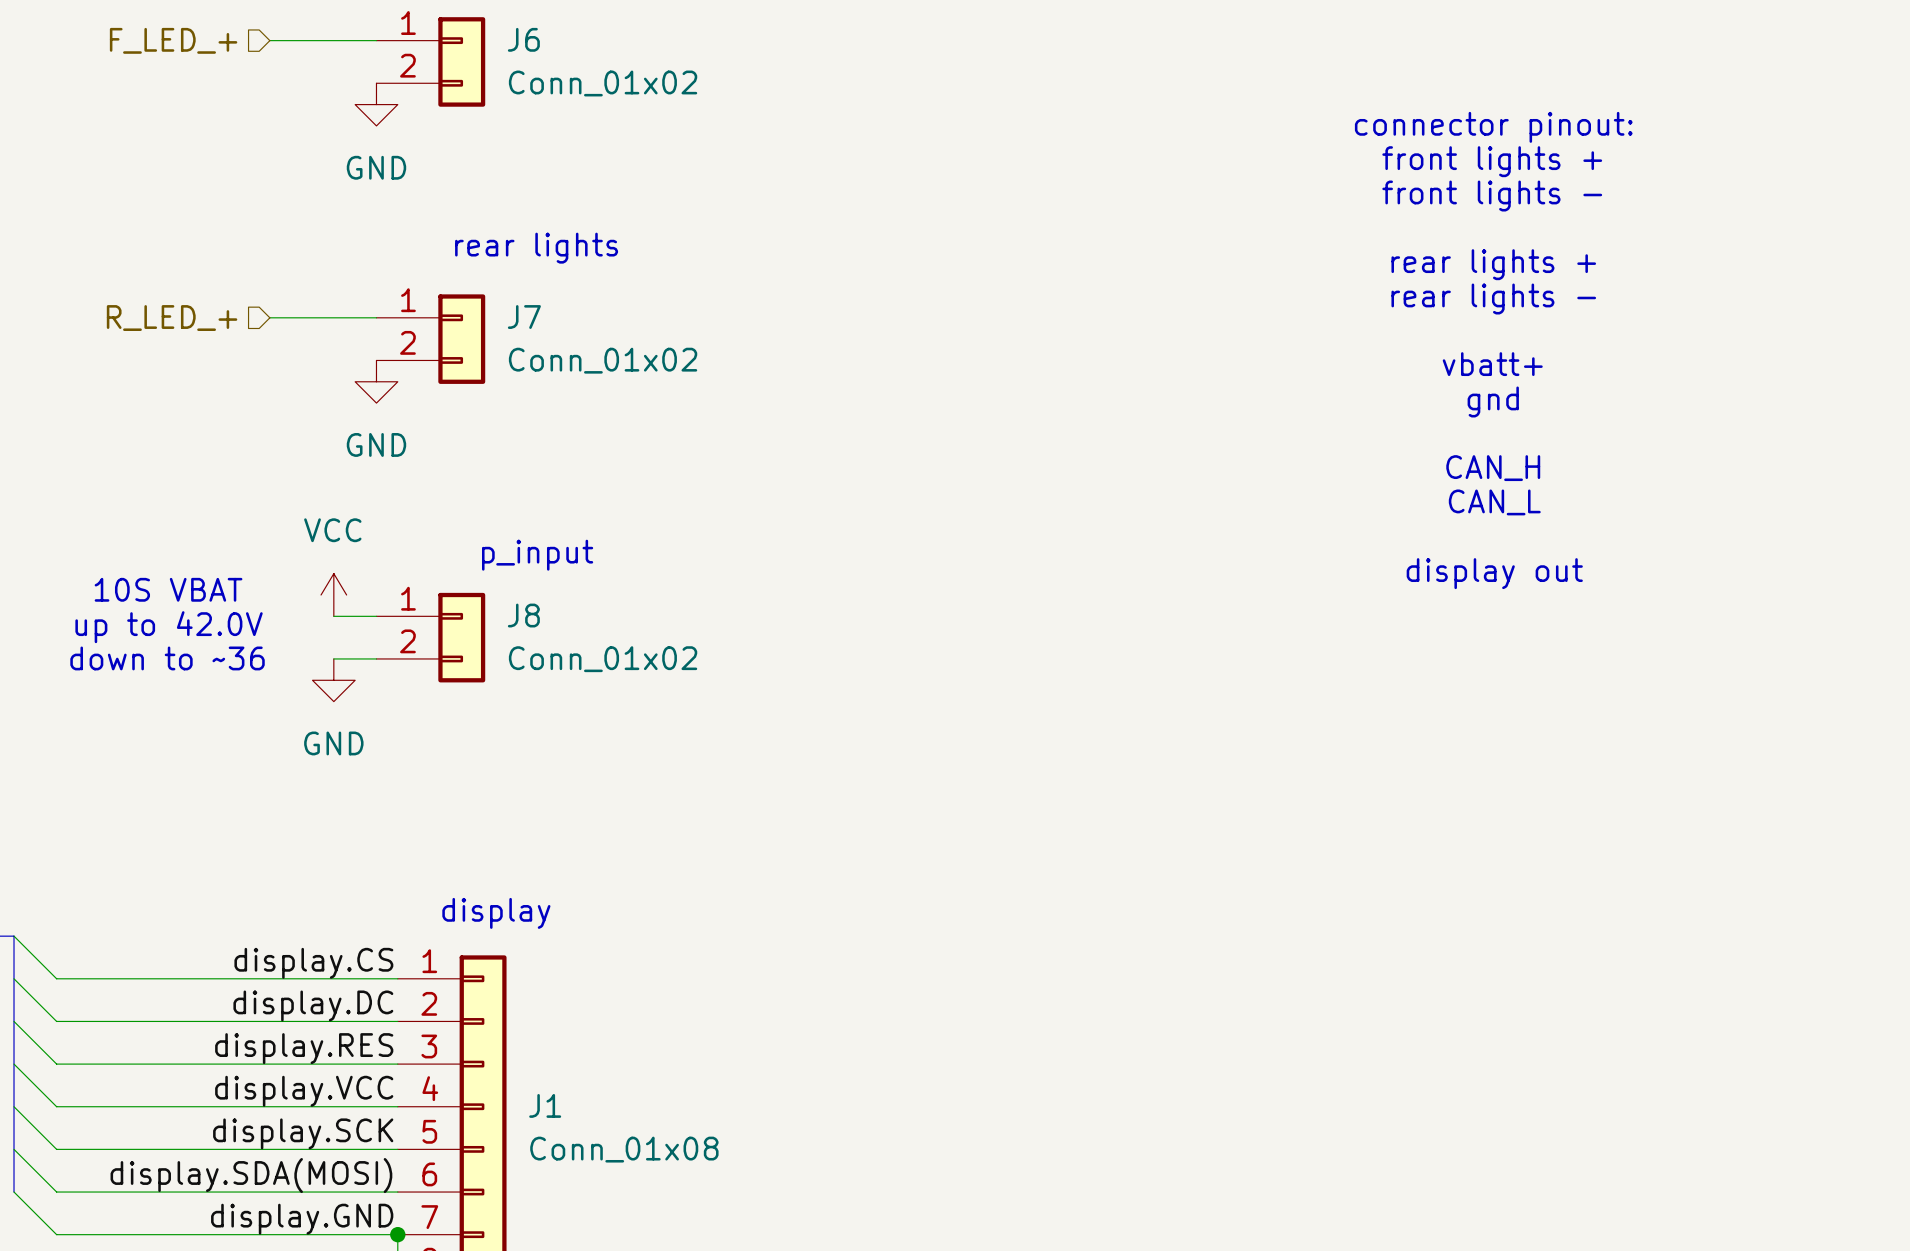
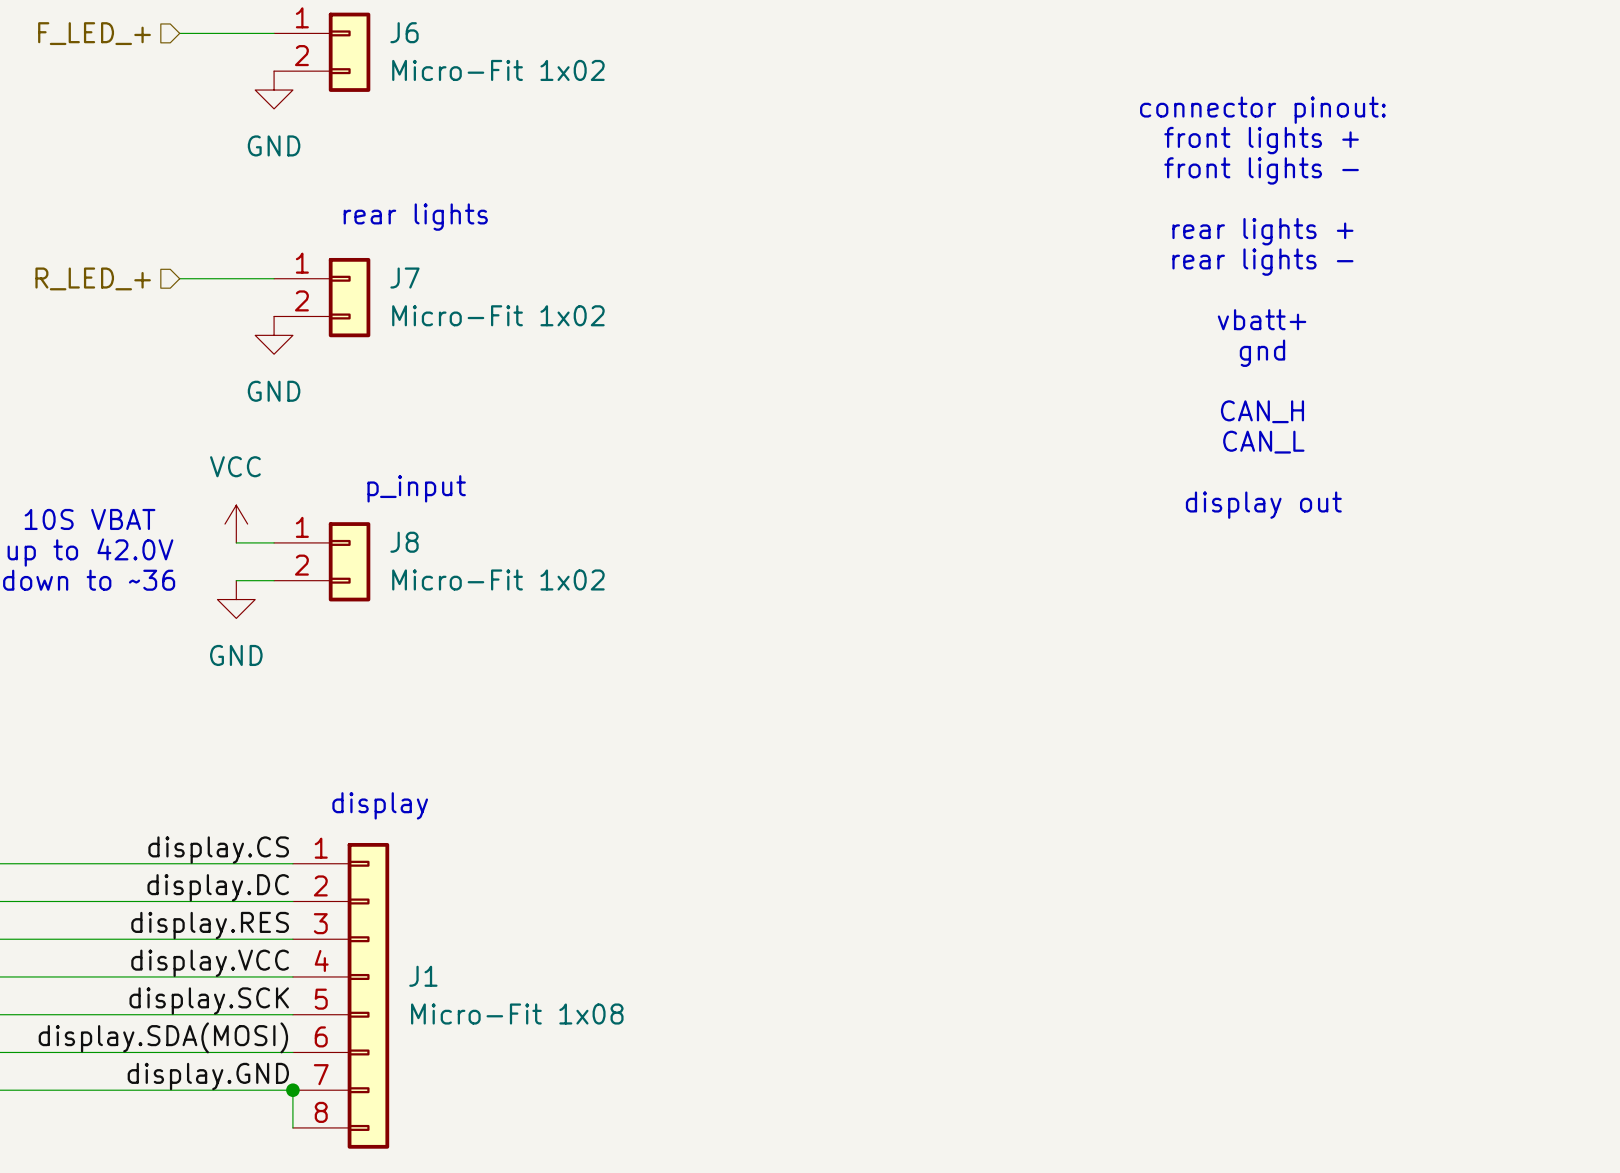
J6 value: Conn_01x02 (603, 83) -> Micro-Fit 1x02 (498, 70)
J7 value: Conn_01x02 (603, 360) -> Micro-Fit 1x02 (498, 315)
J8 value: Conn_01x02 (603, 659) -> Micro-Fit 1x02 (498, 579)
J1 value: Conn_01x08 (624, 1149) -> Micro-Fit 1x08 (517, 1014)

